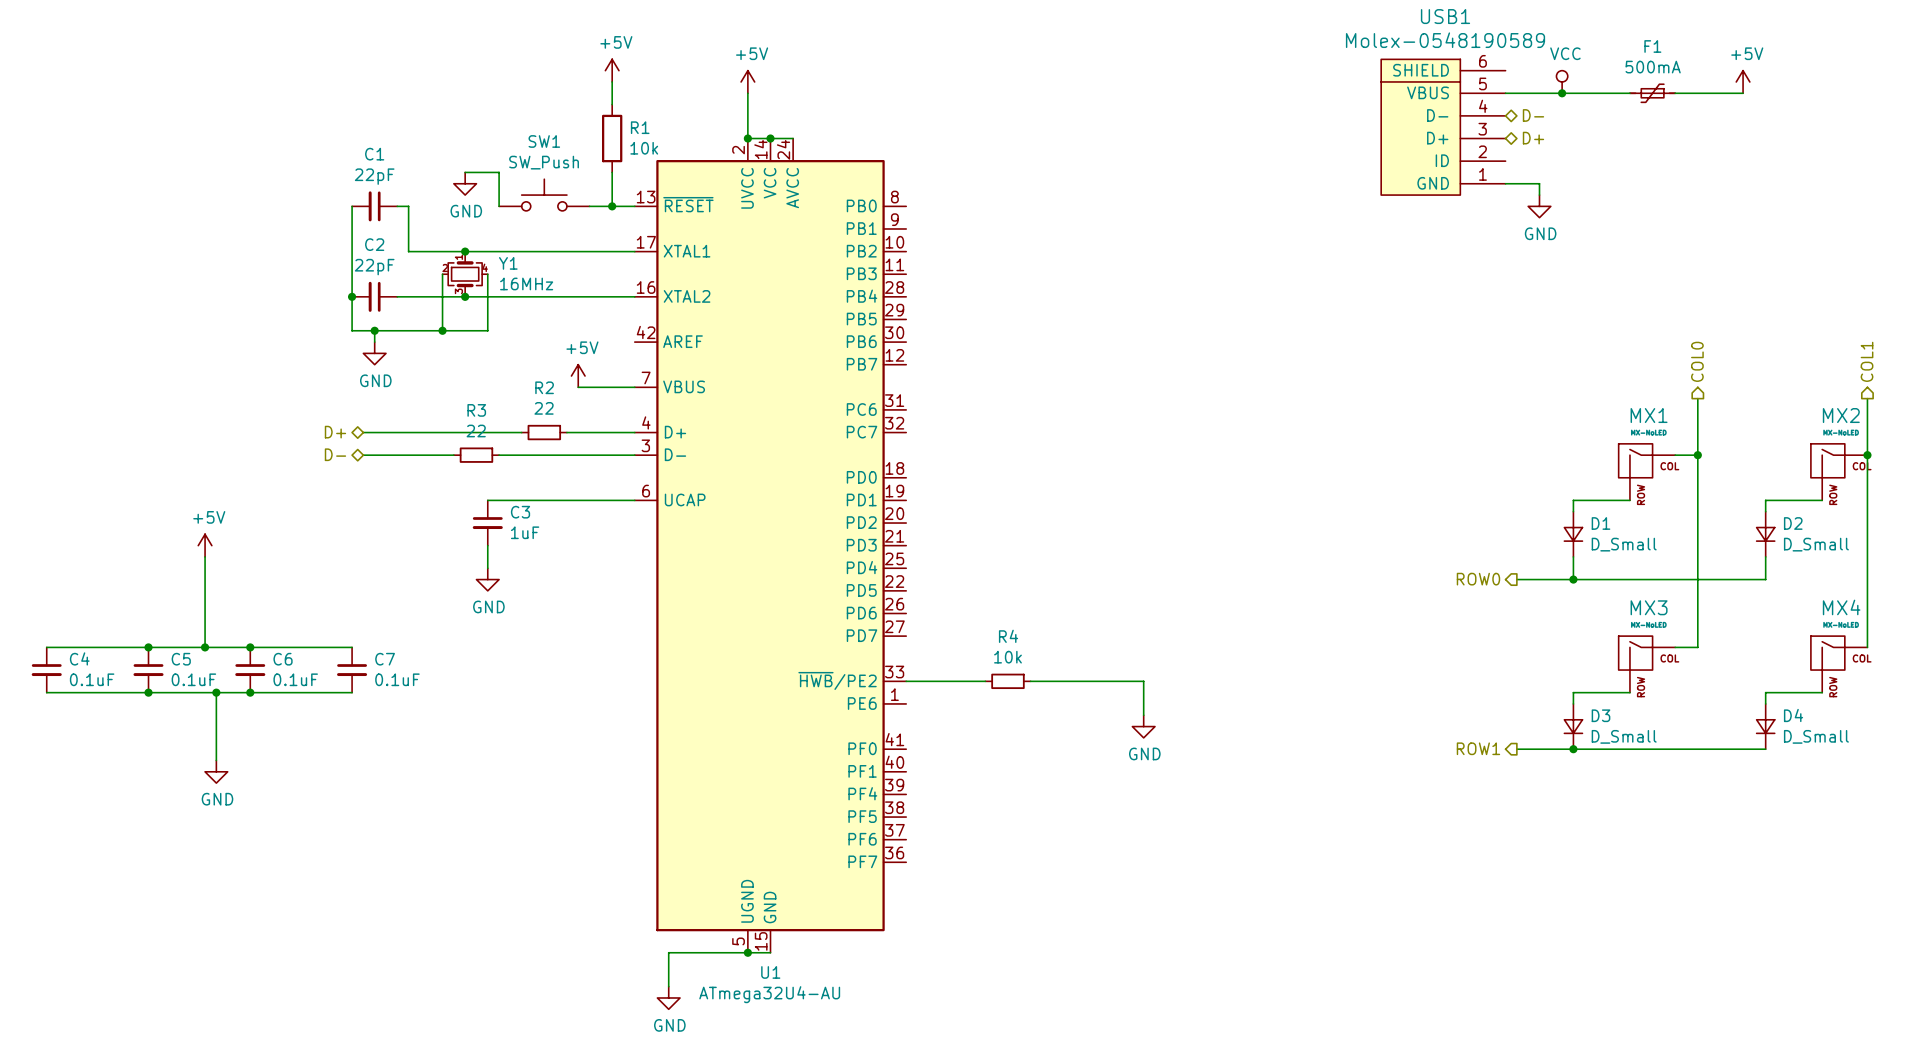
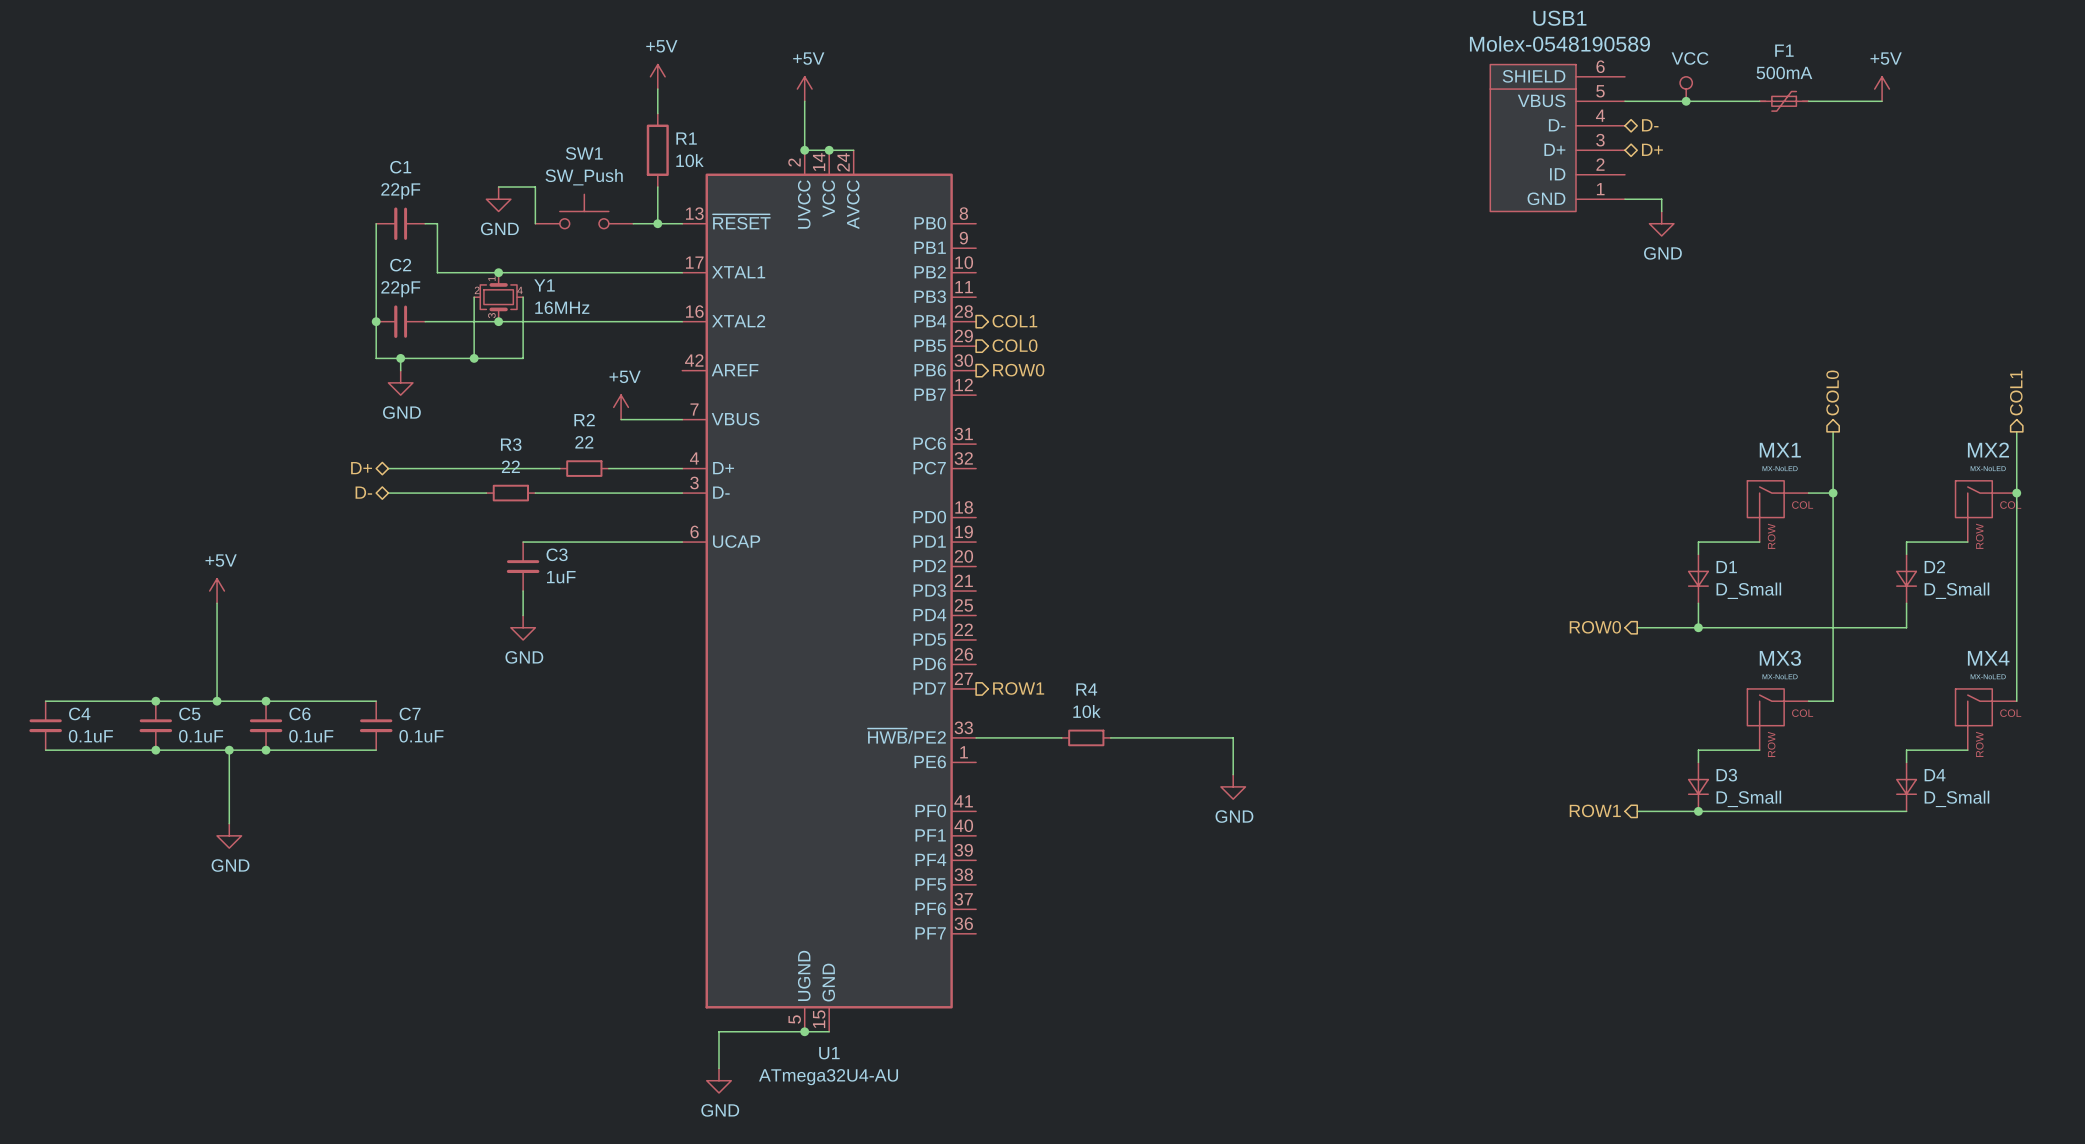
hierarchical label: none -> COL1 (1014, 321)
hierarchical label: none -> COL0 (1015, 345)
hierarchical label: none -> ROW0 (1018, 370)
hierarchical label: none -> ROW1 (1018, 688)

